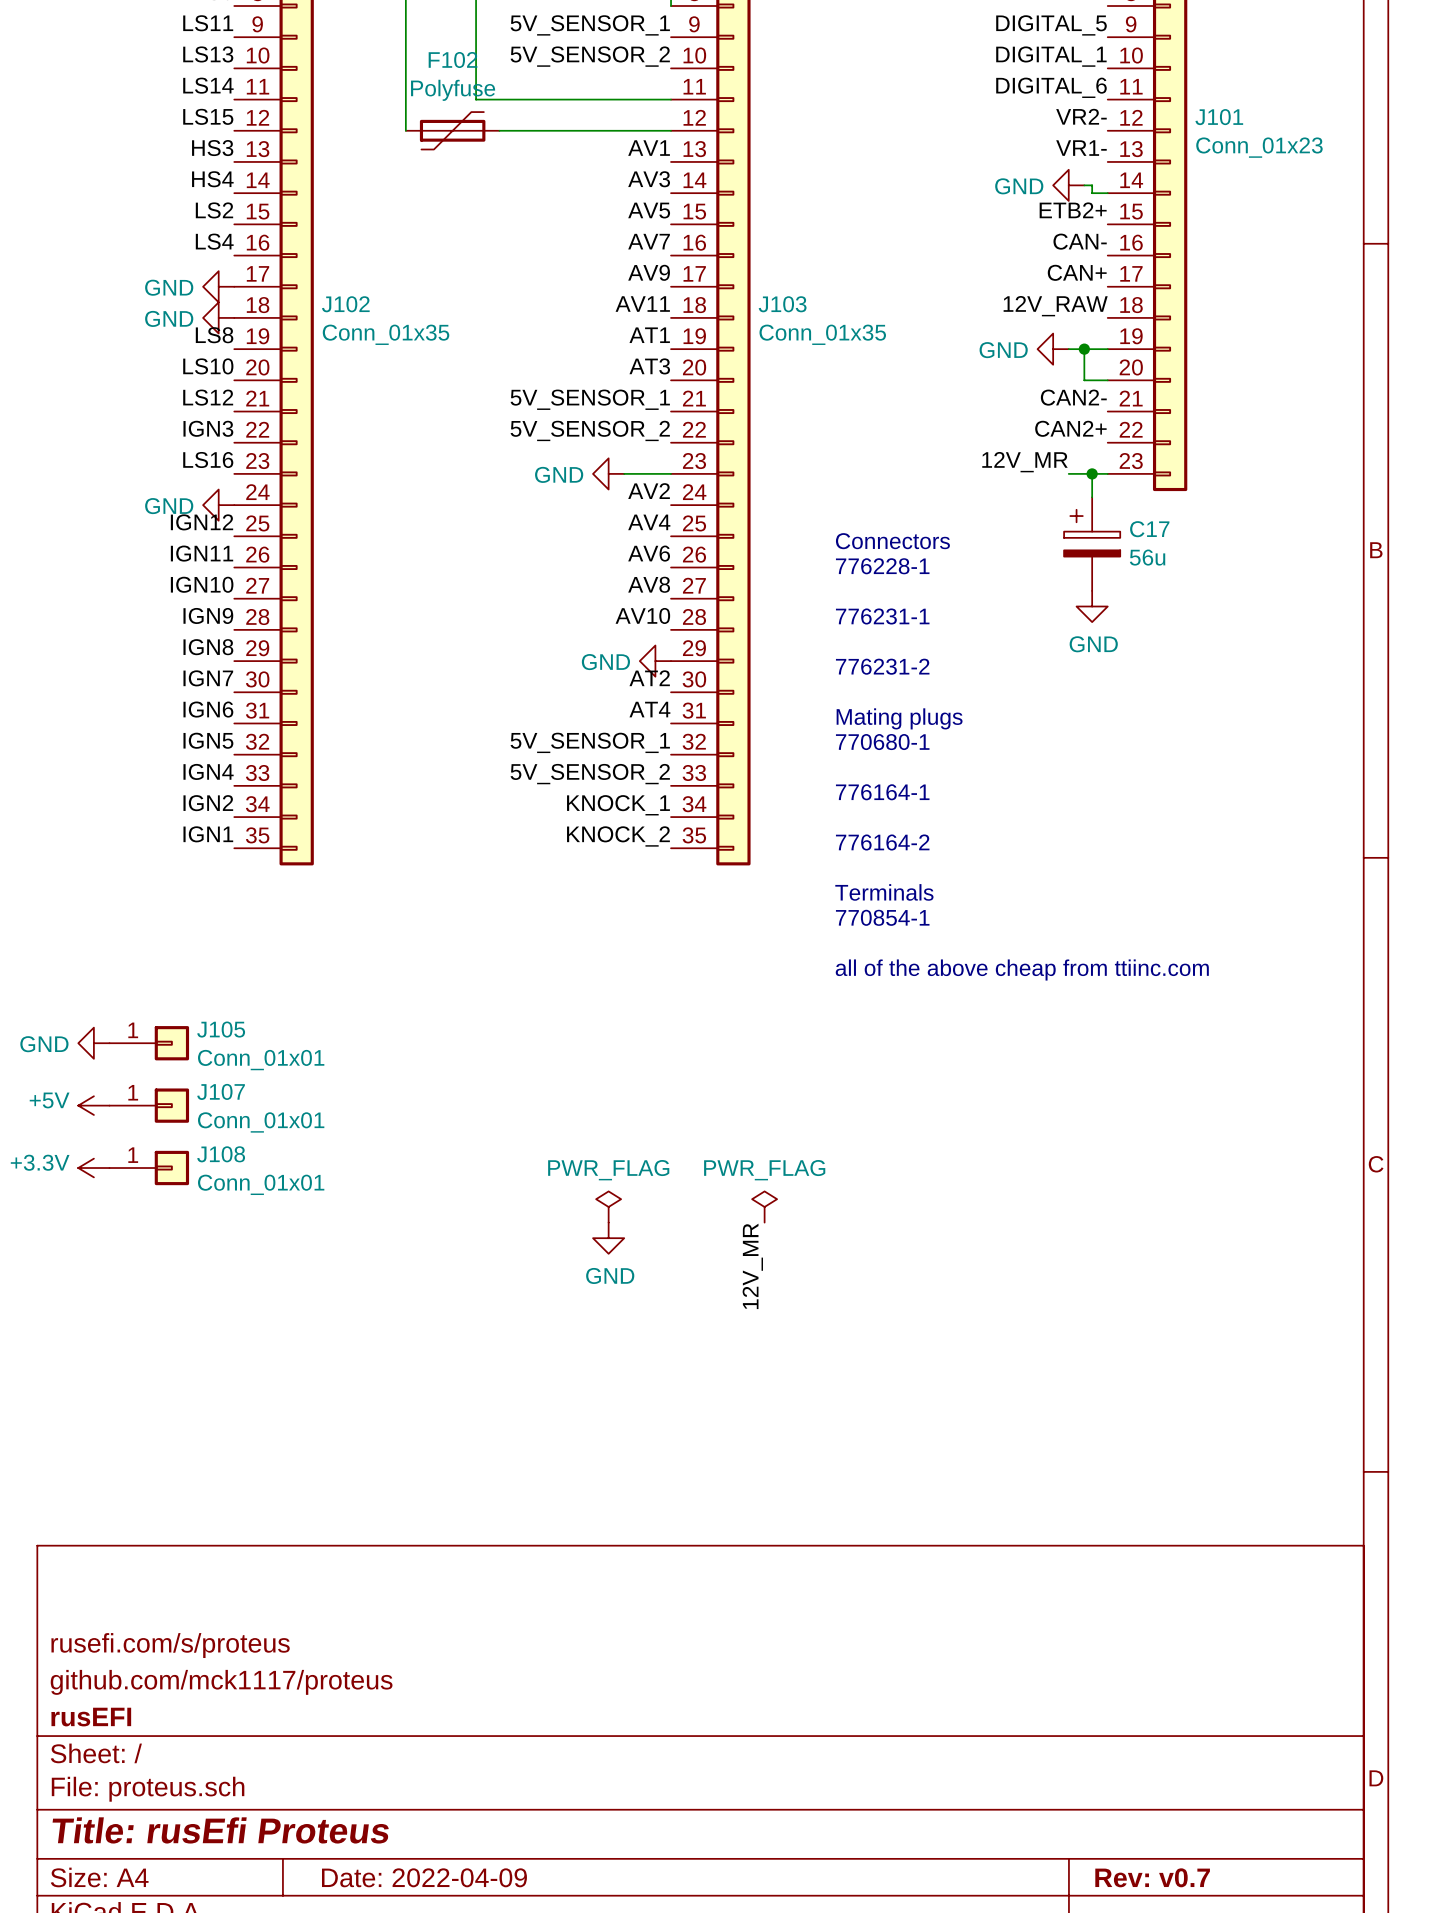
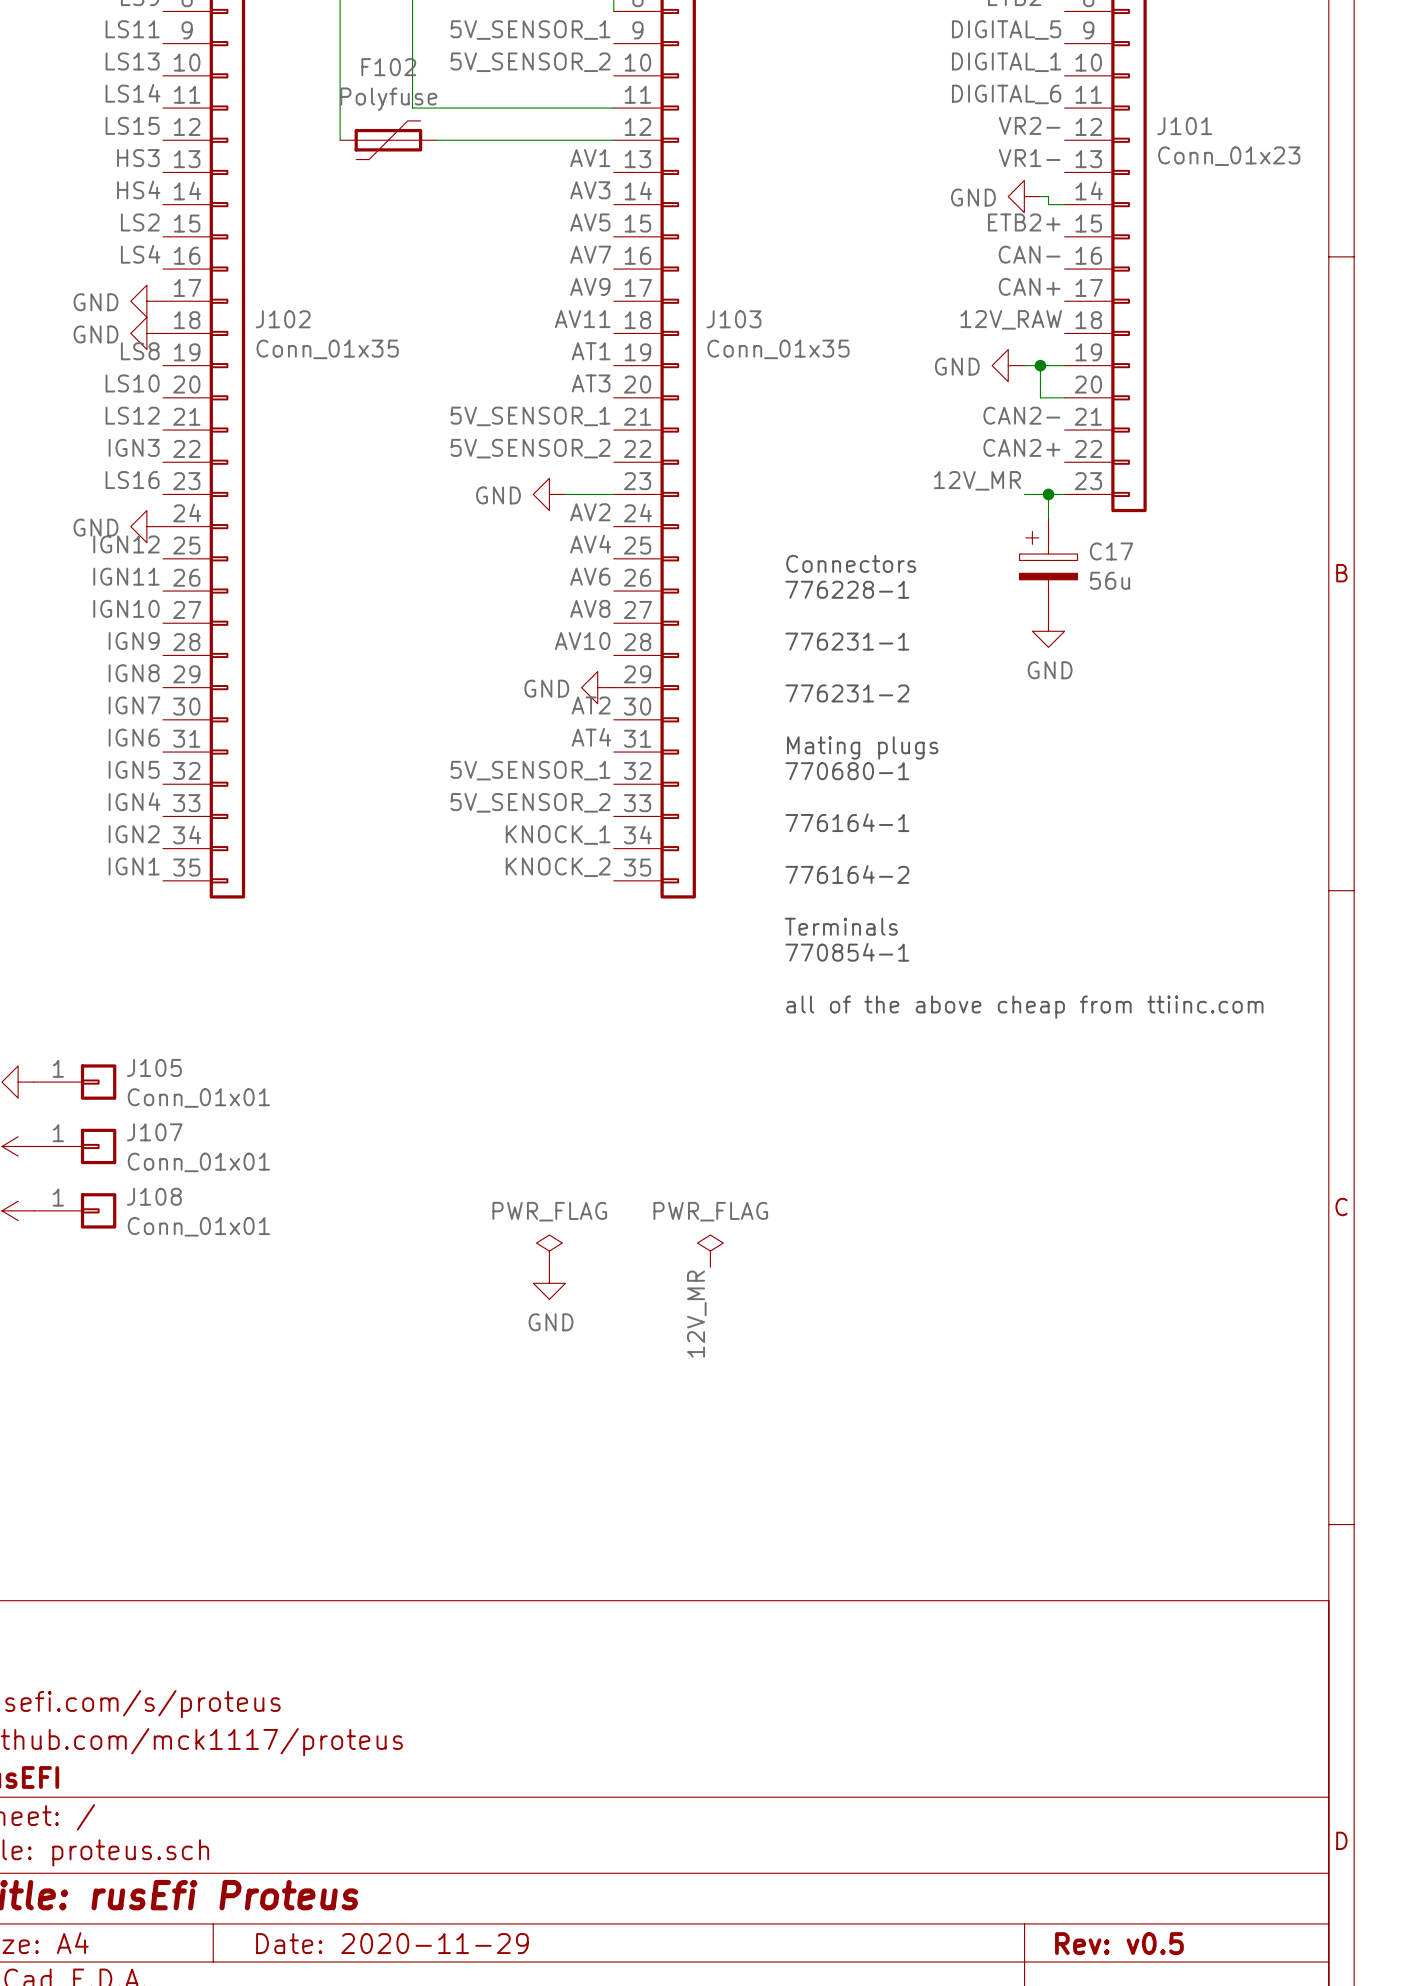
title block: Date: 2022-04-09 (424, 1877) -> Date: 2020-11-29 (392, 1943)
title block: Rev: v0.7 (1152, 1877) -> Rev: v0.5 (1119, 1943)

